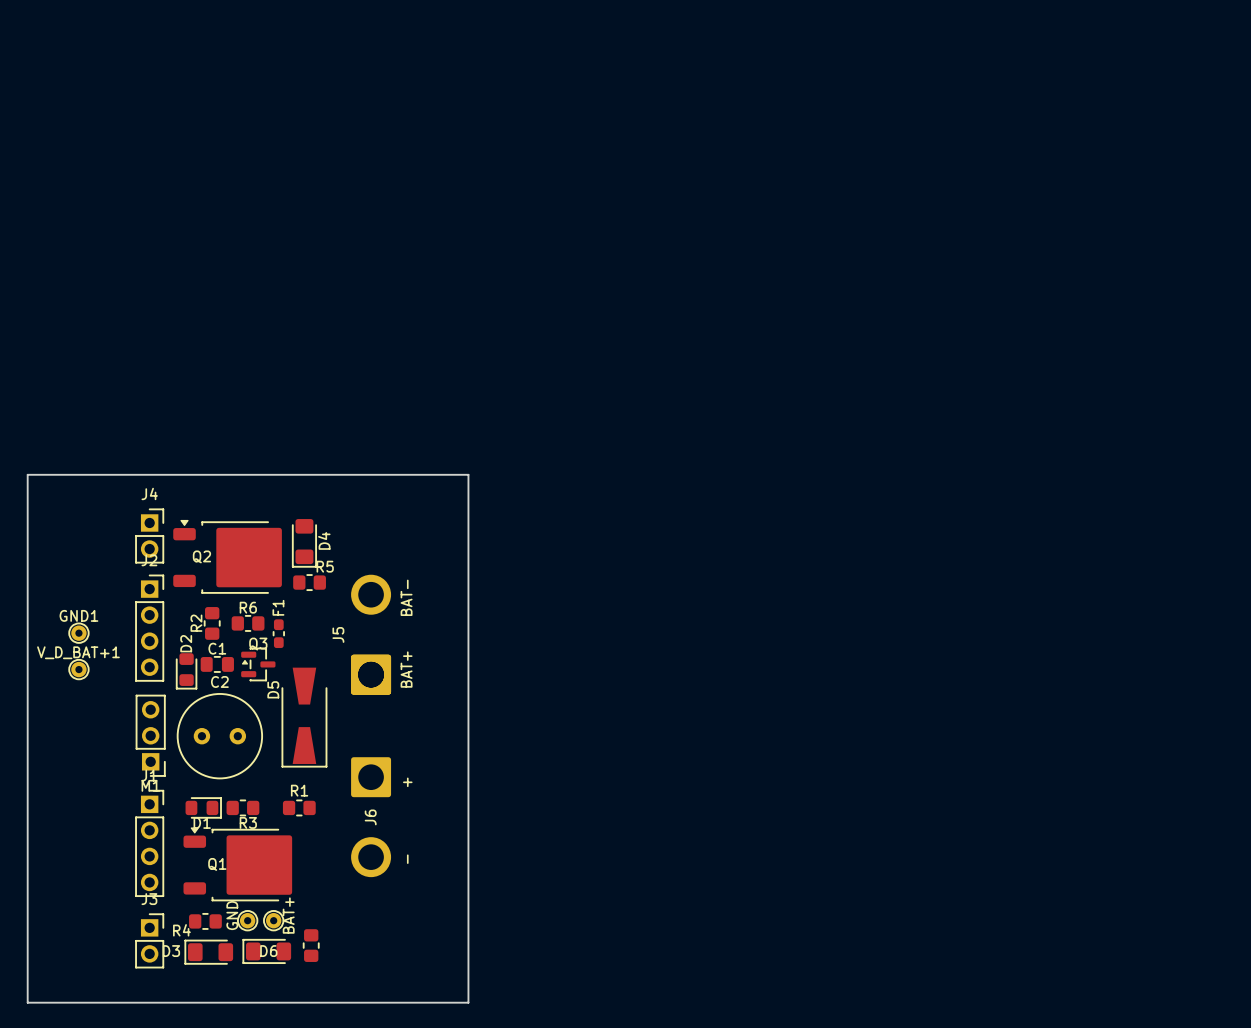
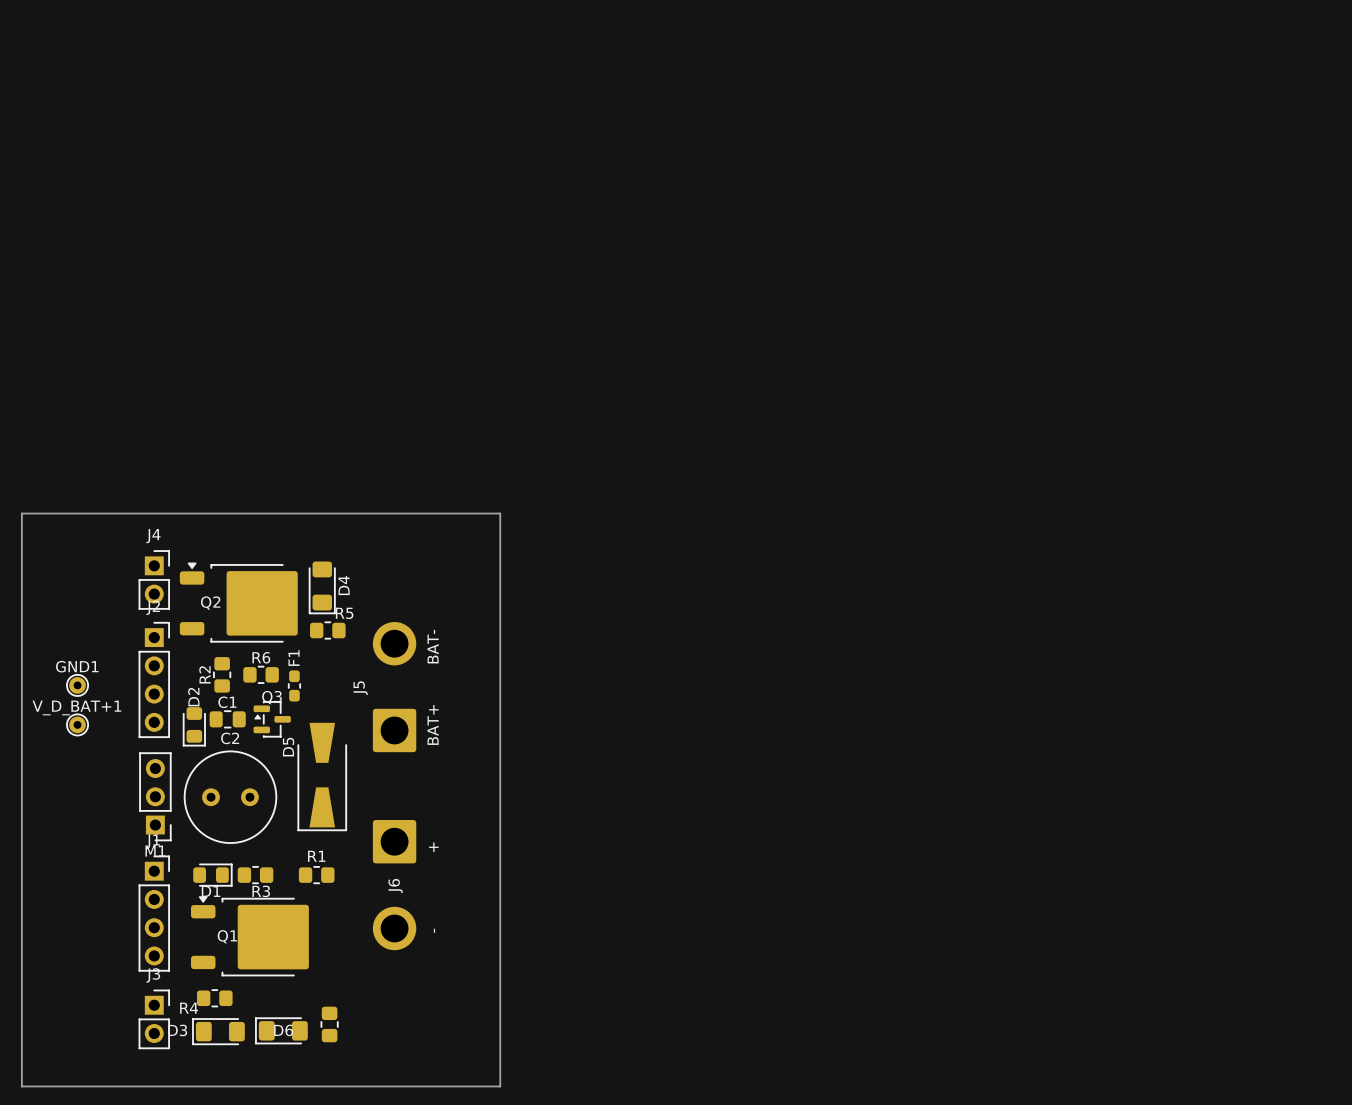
part: (371, 674) -> none
GND: (247, 920) -> none
BAT+: (273, 920) -> none

